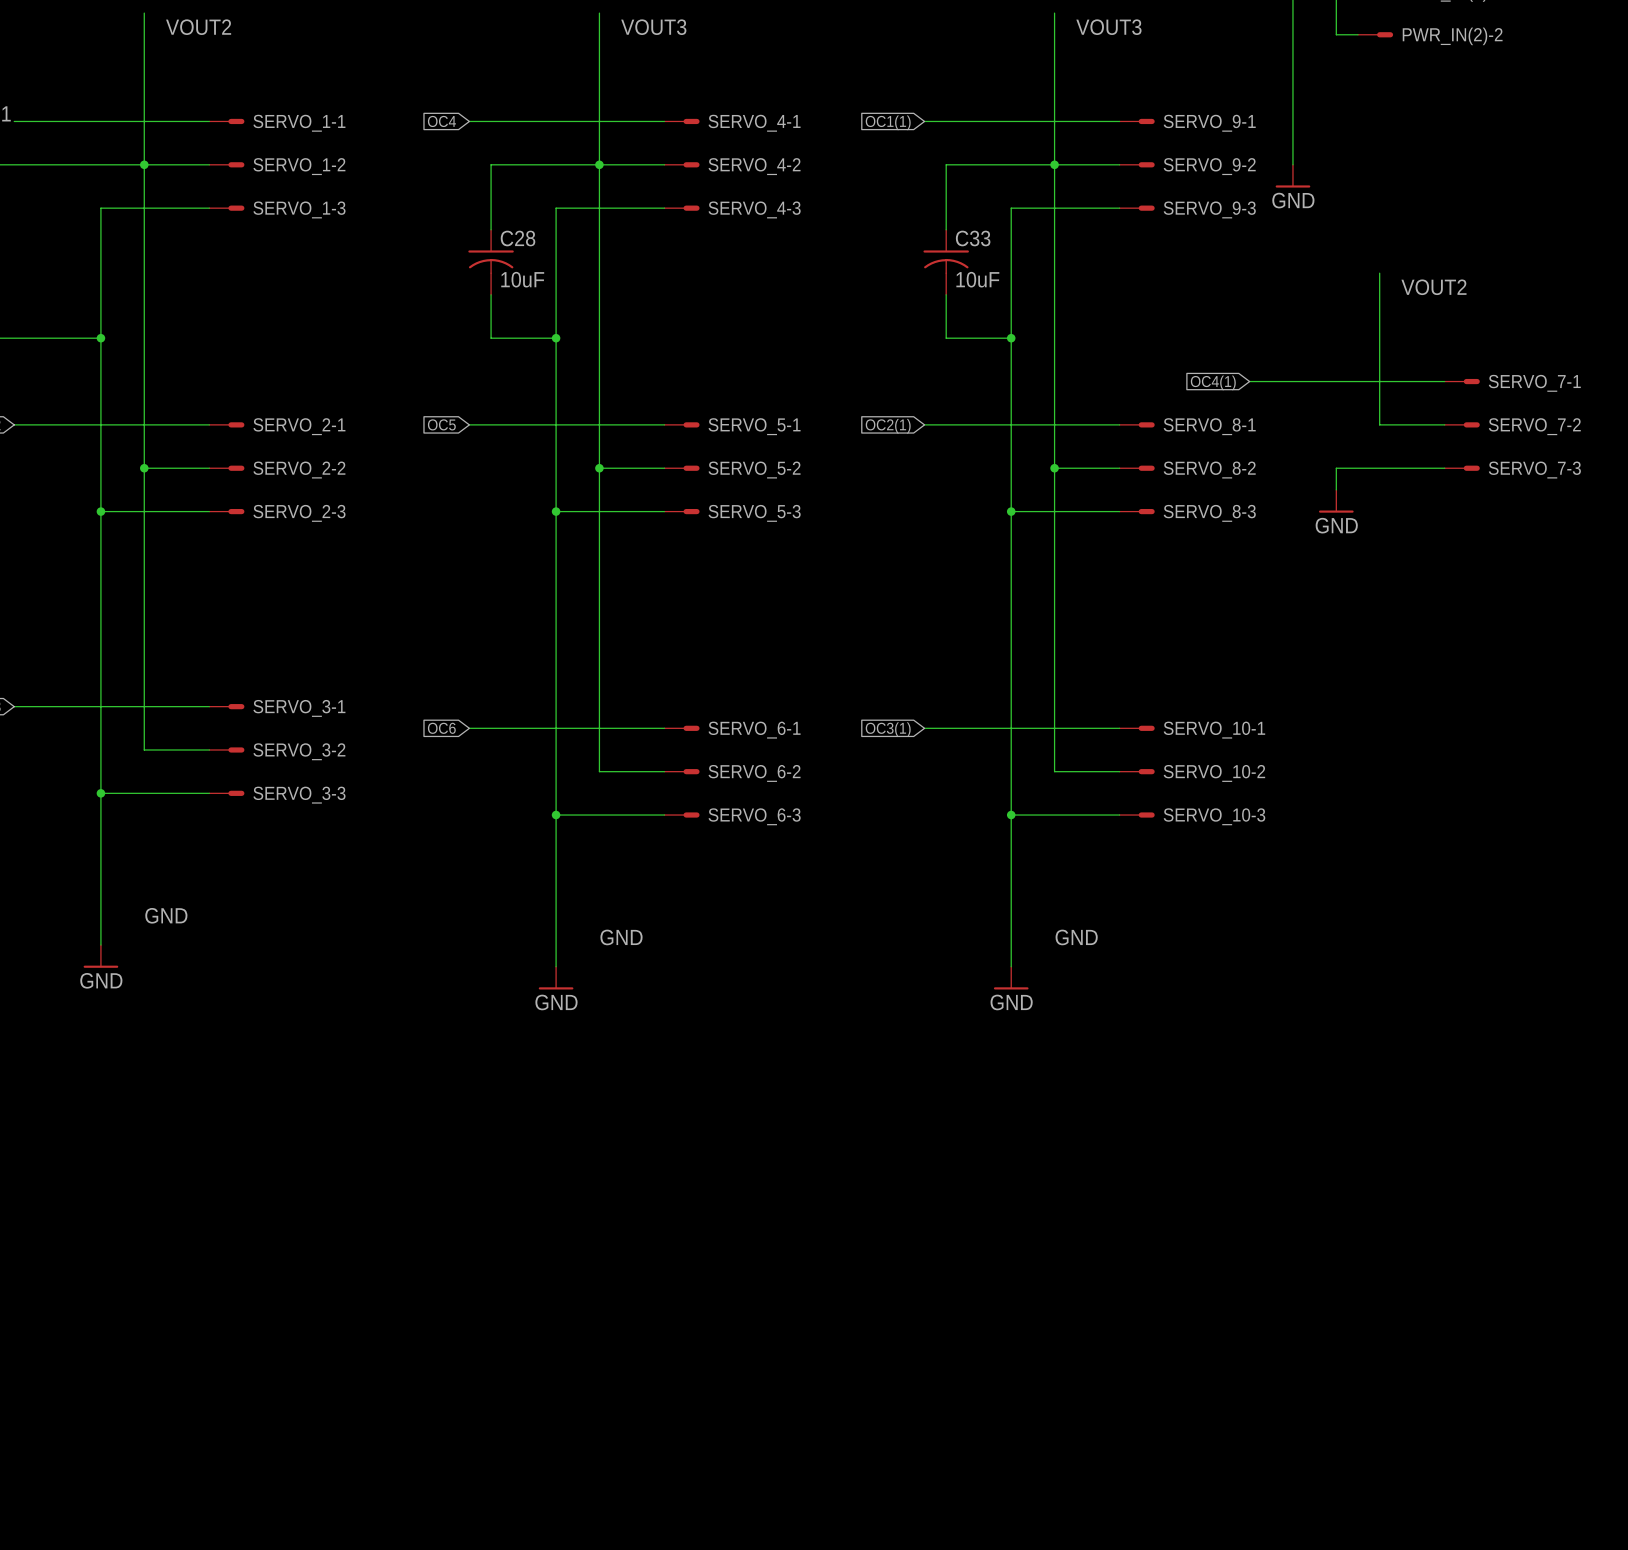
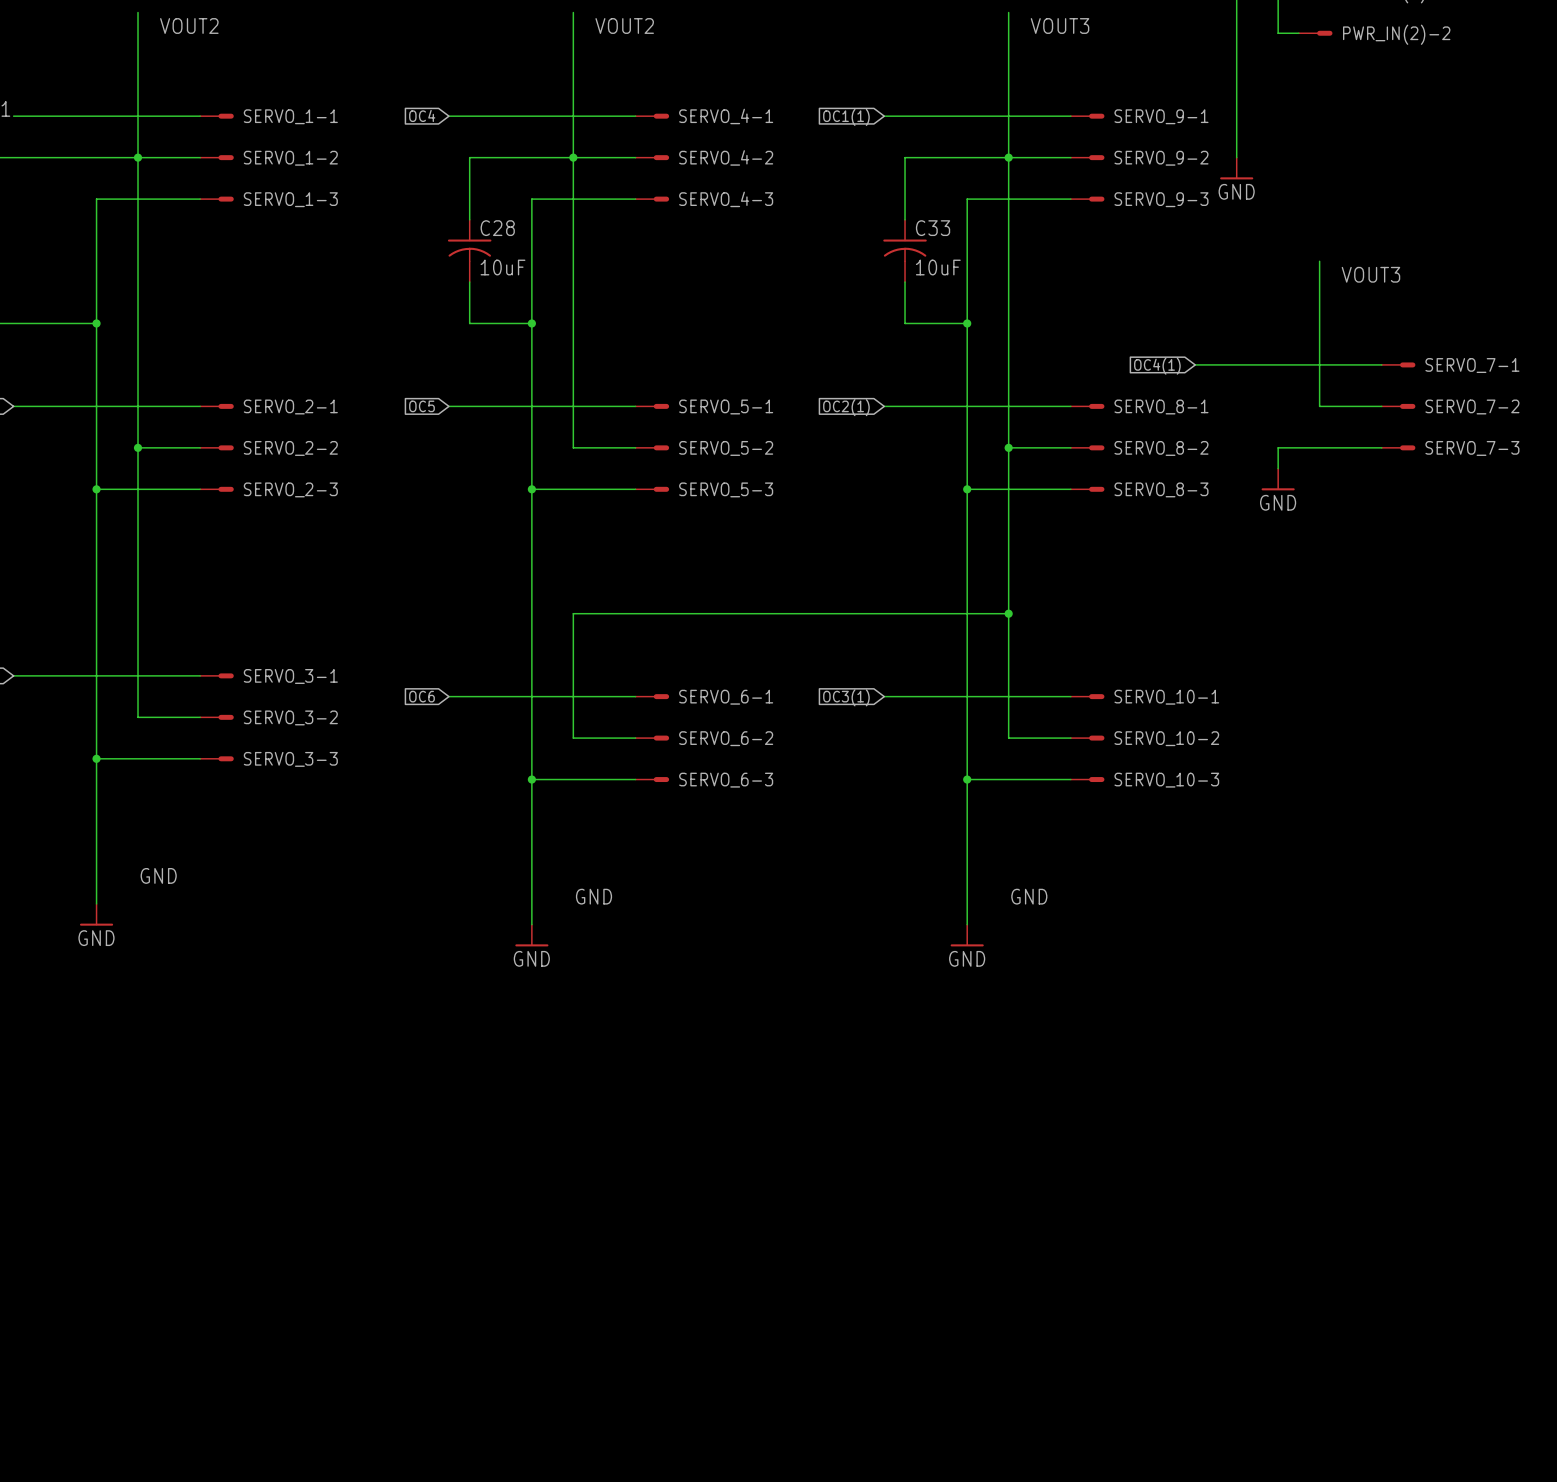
label: VOUT3 (653, 27) -> VOUT2 (624, 26)
label: VOUT2 (1433, 287) -> VOUT3 (1370, 274)
wire: (599, 468) (599, 641) -> (1008, 613) (573, 613)
junction: (599, 468) -> none
junction: none -> (1008, 613)

